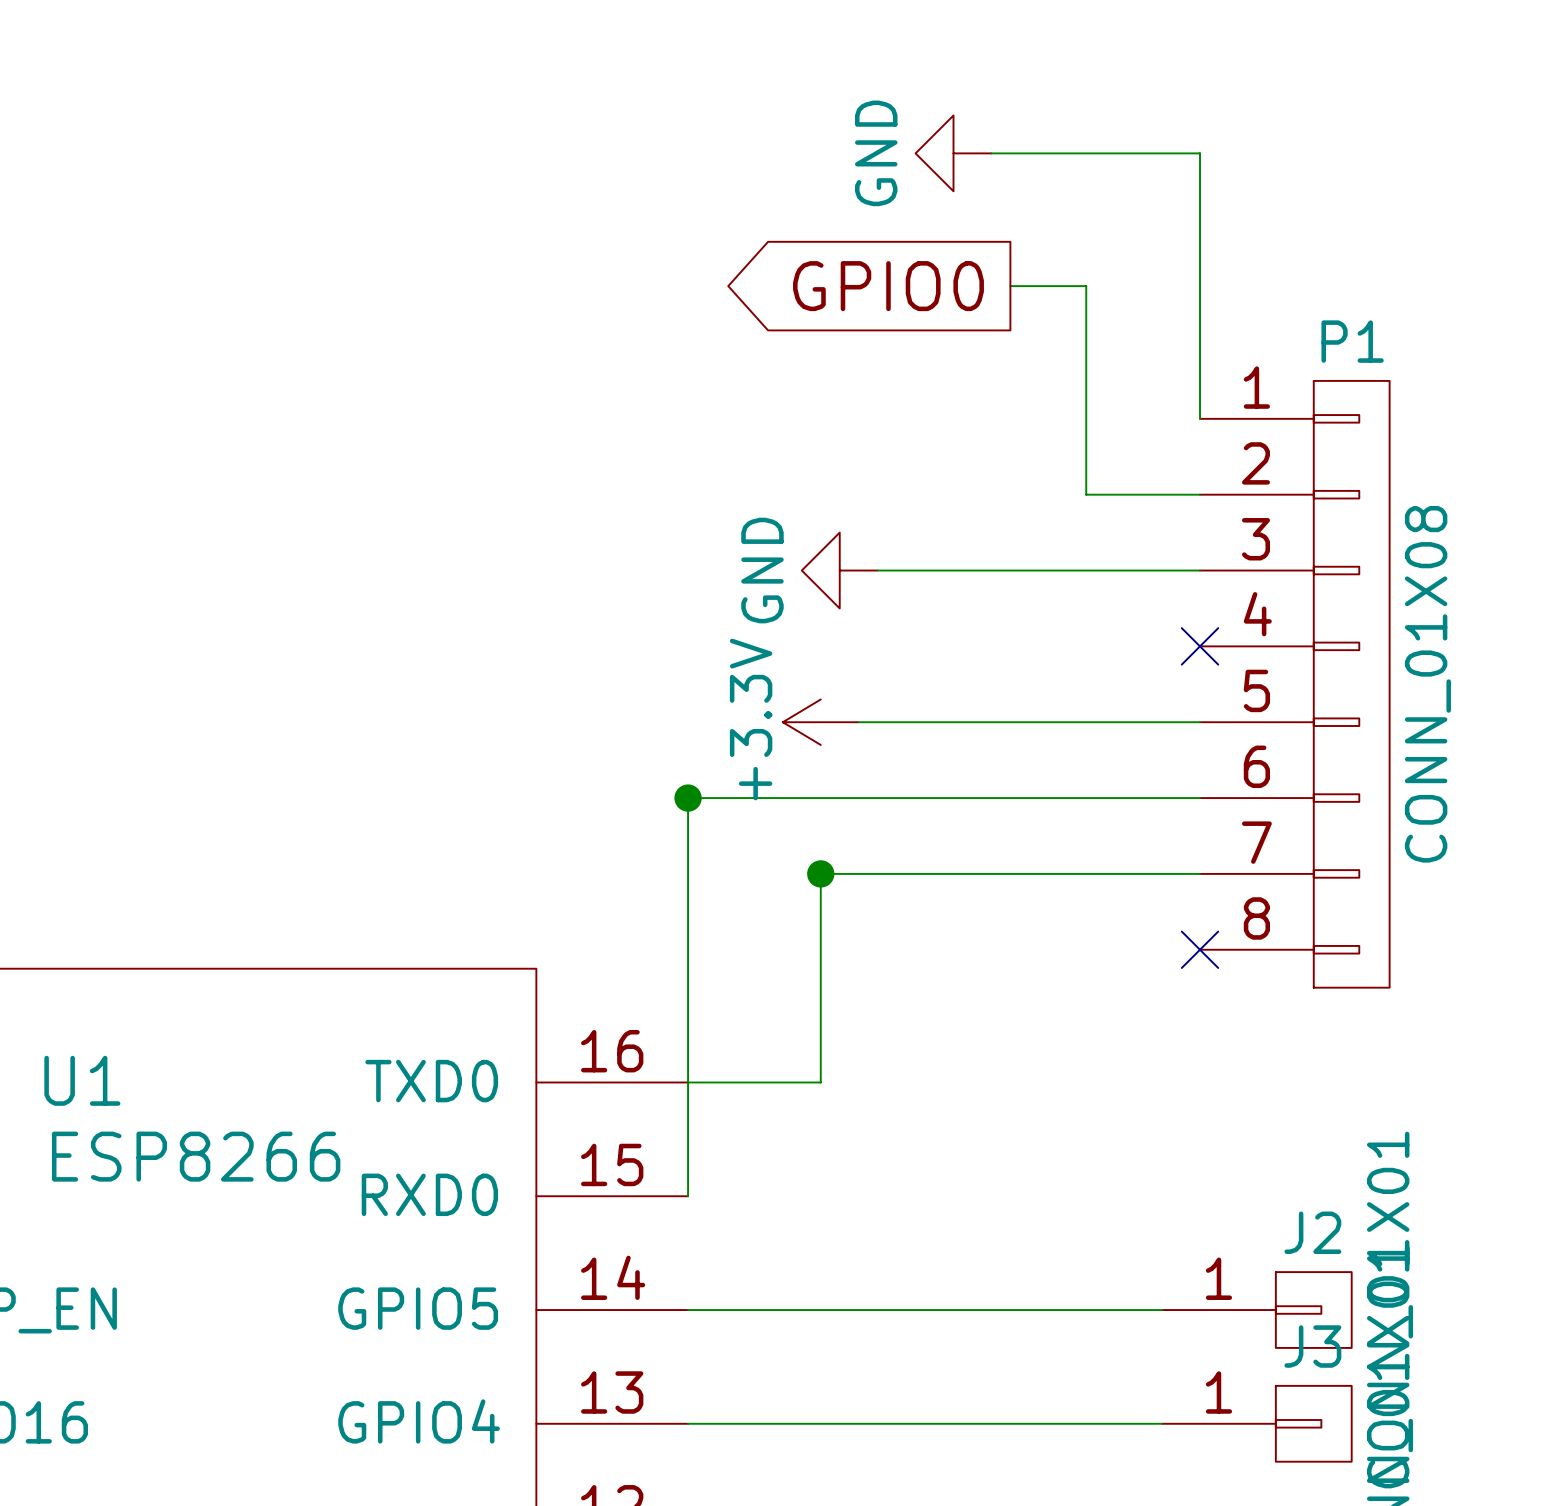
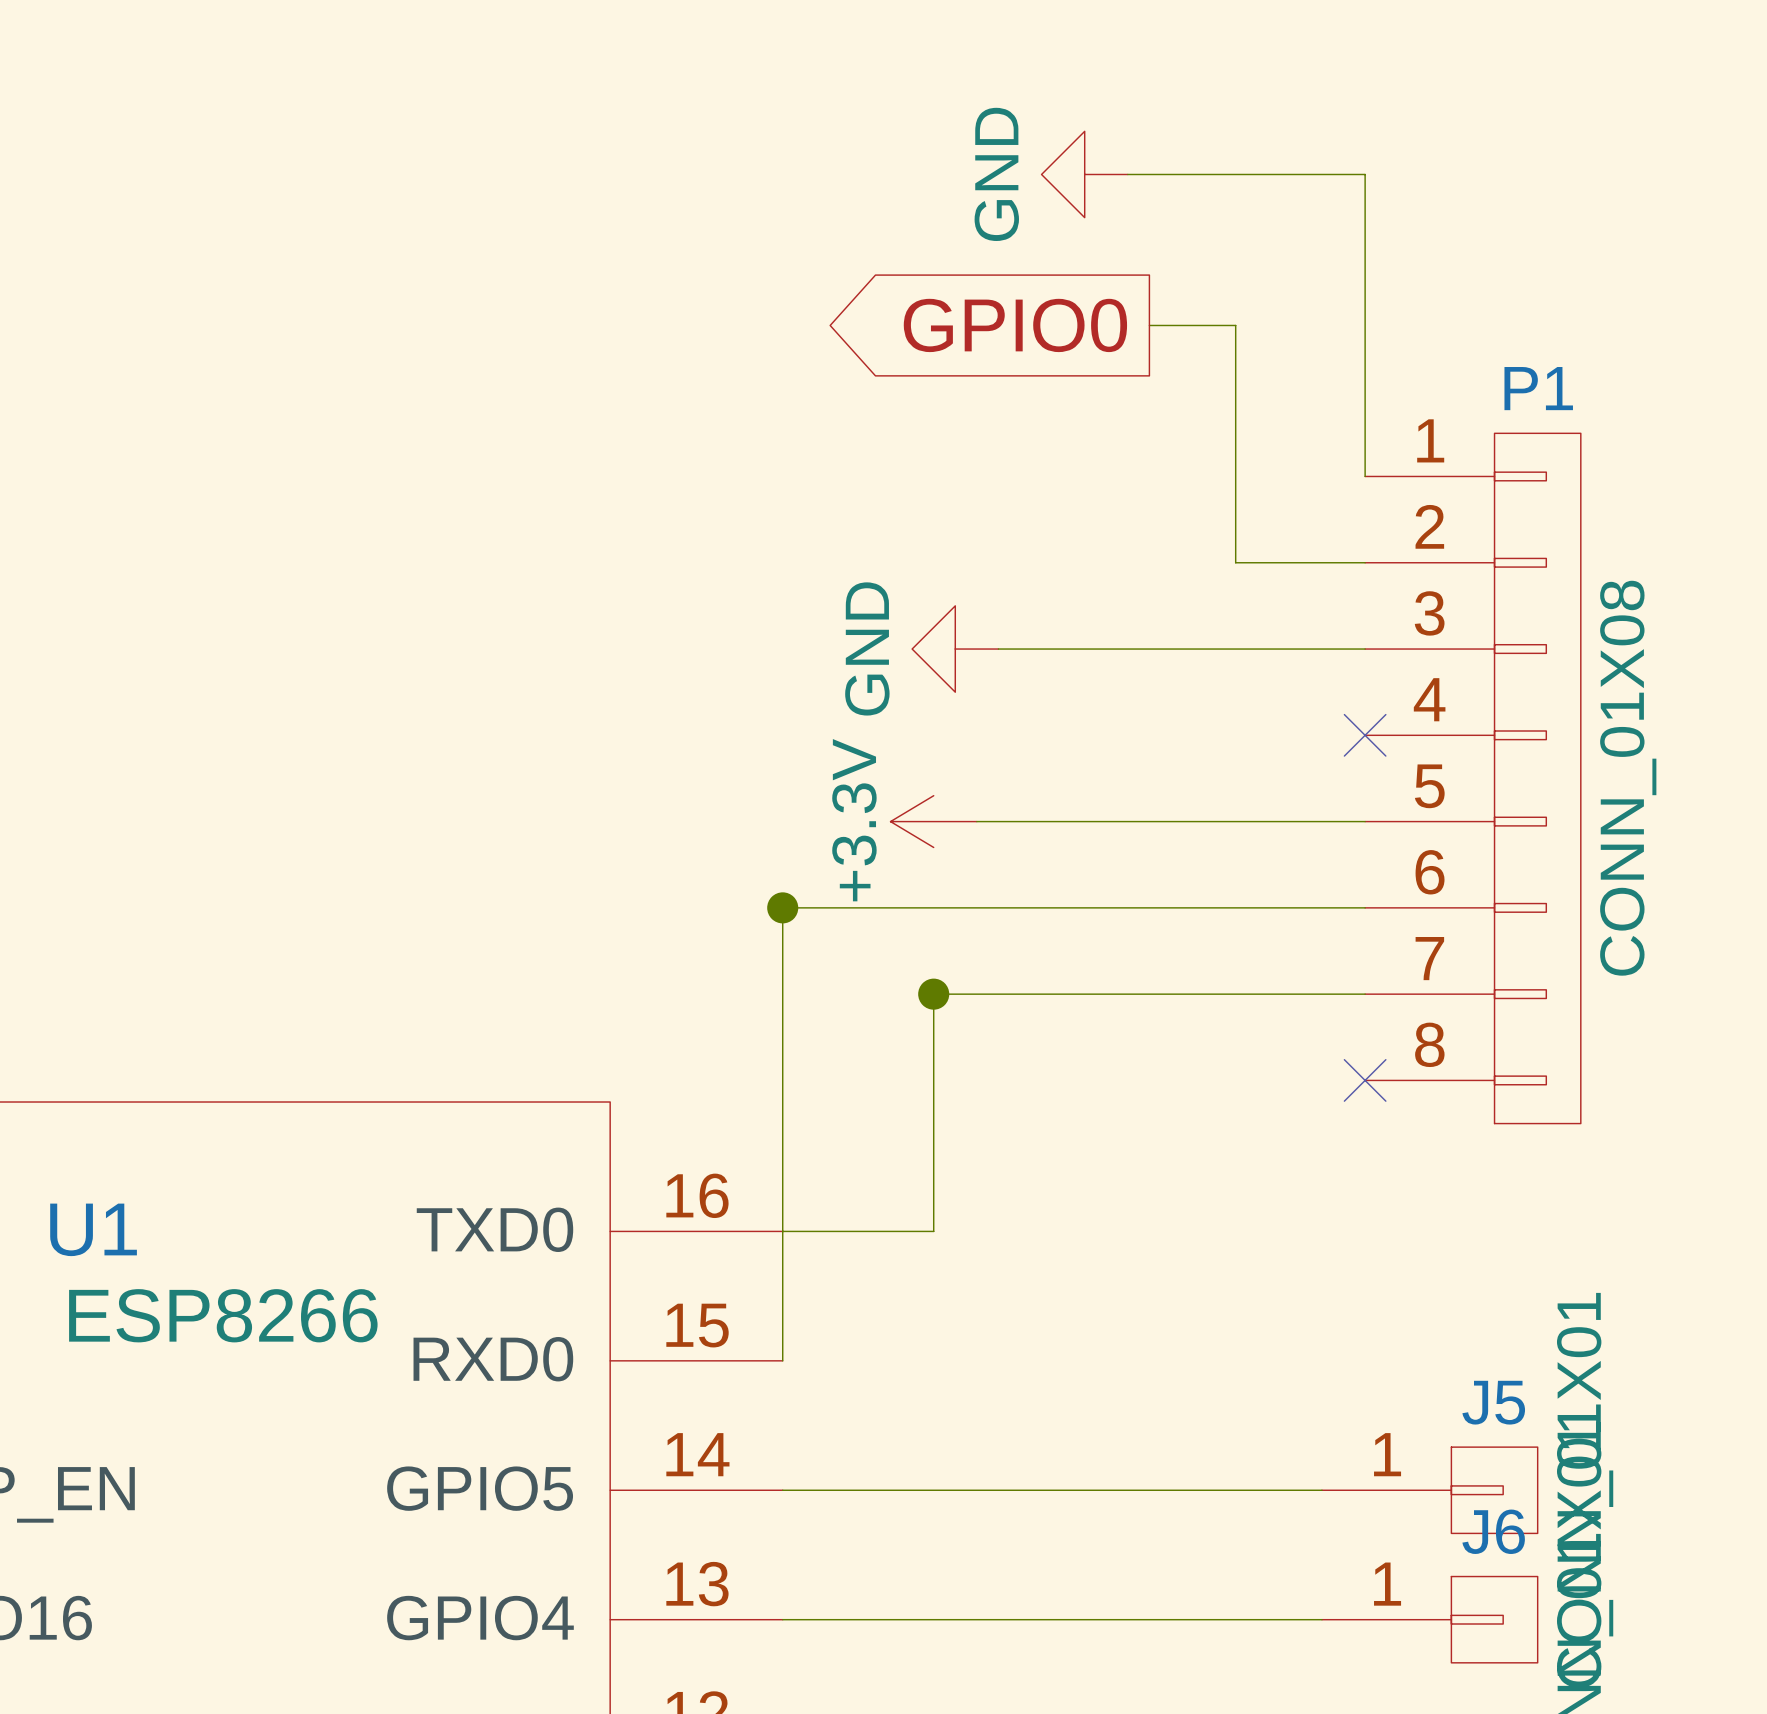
J2 name: J2 (1312, 1232) -> J5 (1493, 1402)
J3 name: J3 (1312, 1346) -> J6 (1493, 1531)

